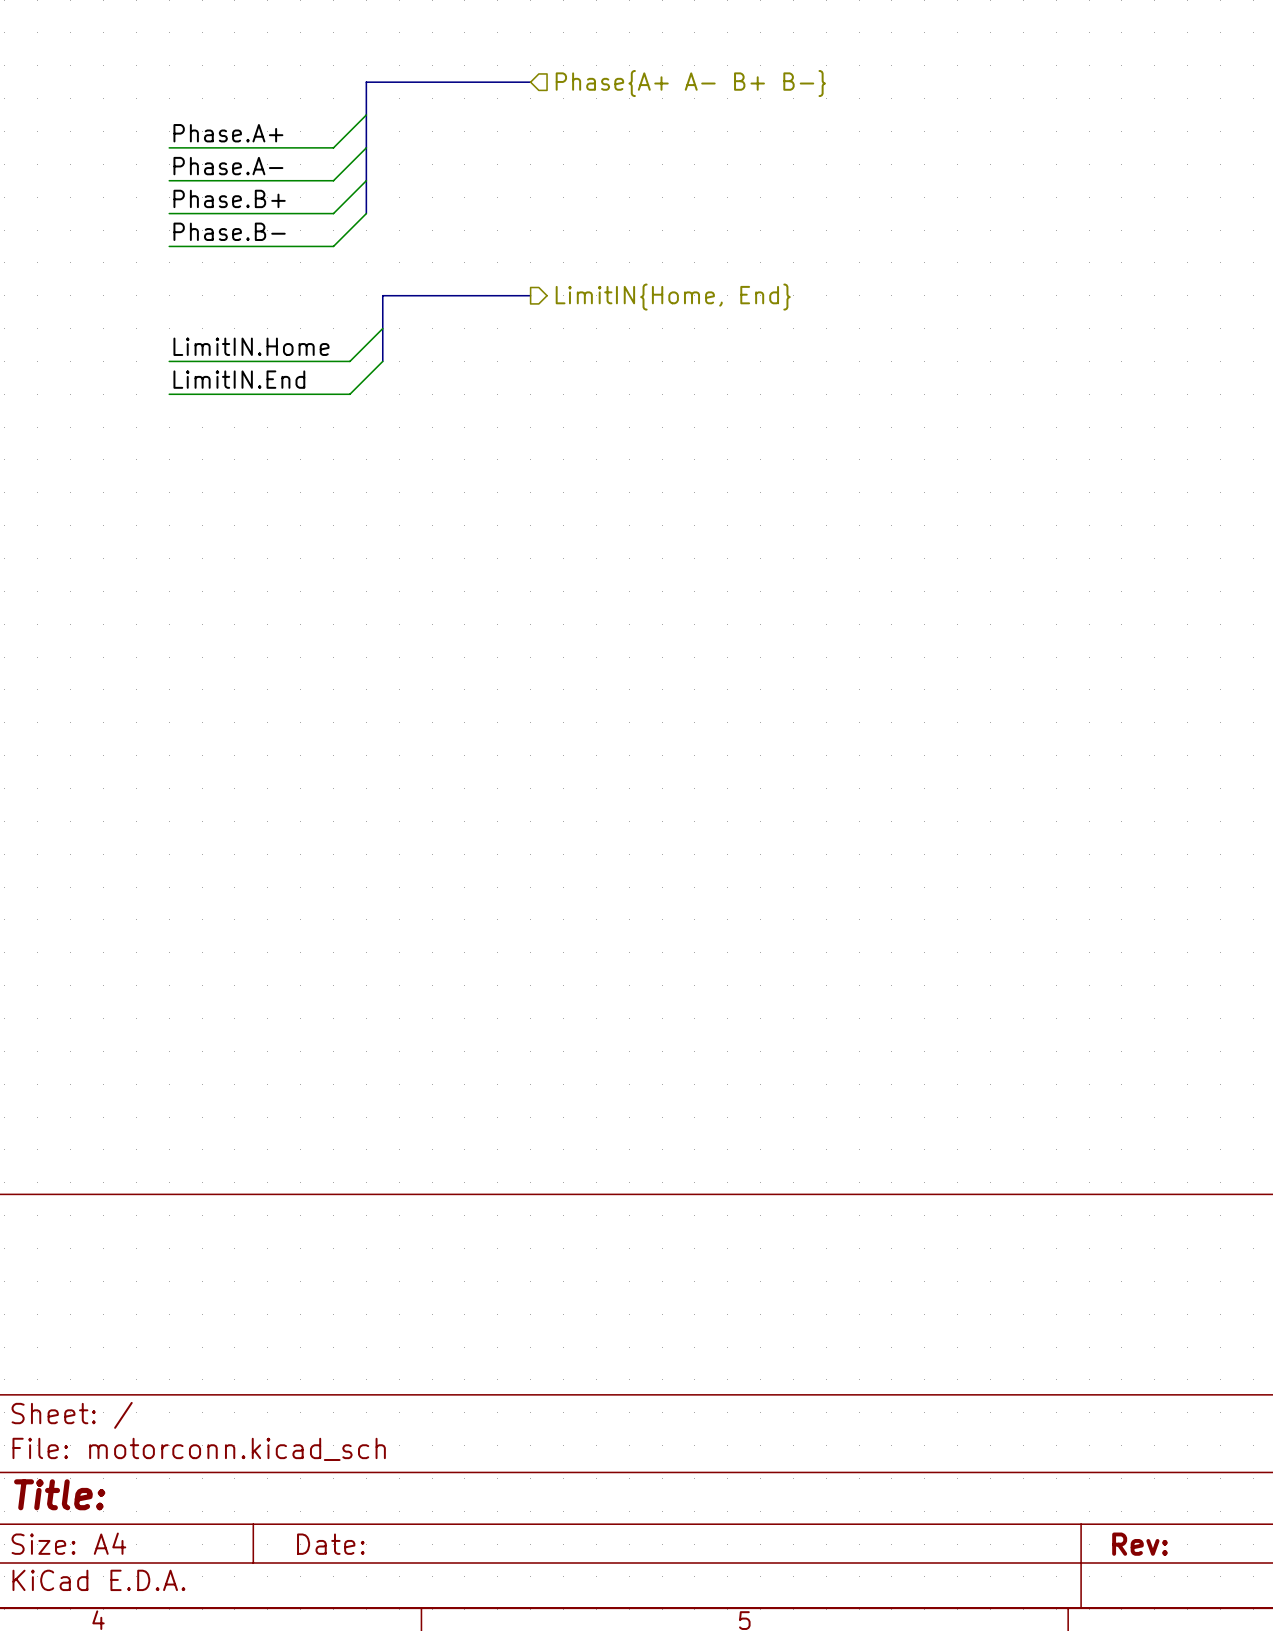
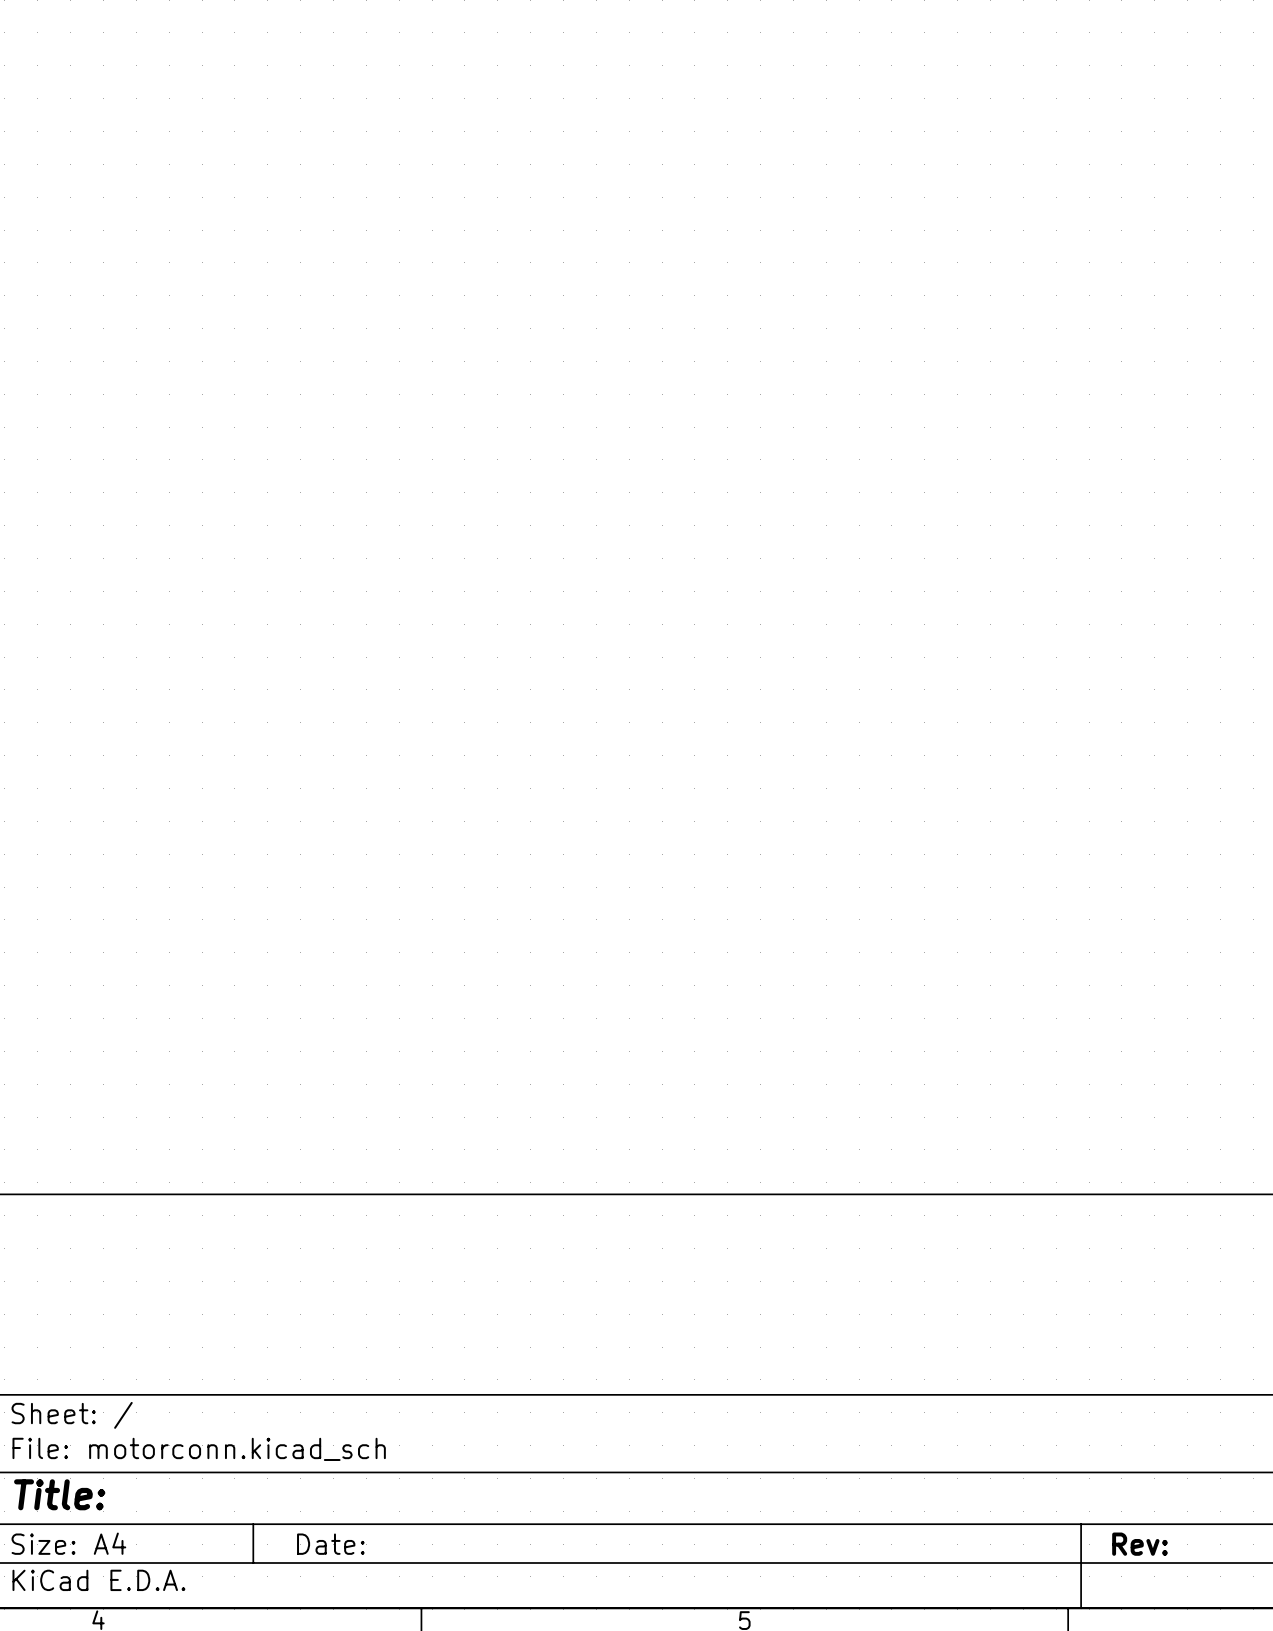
bus: (530, 82) (366, 82) (366, 213) -> none
hierarchical label: Phase{A+ A- B+ B-} (690, 83) -> none
wire: (366, 115) (333, 147) (169, 147) -> none
label: Phase.A+ (228, 133) -> none
wire: (366, 147) (333, 180) (169, 180) -> none
label: Phase.A- (228, 166) -> none
wire: (366, 180) (333, 213) (169, 213) -> none
label: Phase.B+ (229, 198) -> none
wire: (366, 213) (333, 246) (169, 246) -> none
label: Phase.B- (229, 231) -> none
bus: (530, 295) (382, 295) (382, 361) -> none
hierarchical label: LimitIN{Home, End} (673, 297) -> none
wire: (382, 328) (349, 361) (169, 361) -> none
label: LimitIN.Home (251, 346) -> none
wire: (382, 361) (349, 394) (169, 394) -> none
label: LimitIN.End (239, 379) -> none

